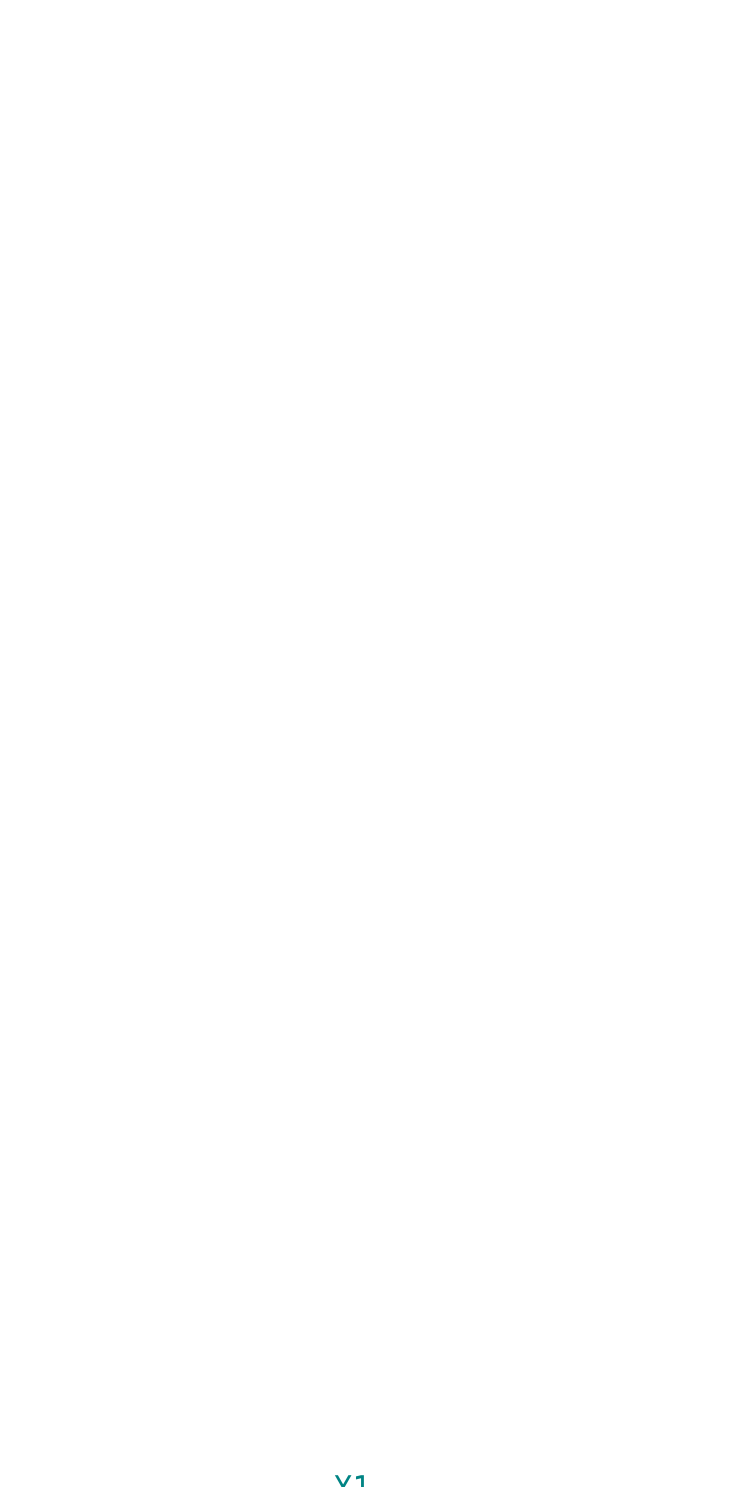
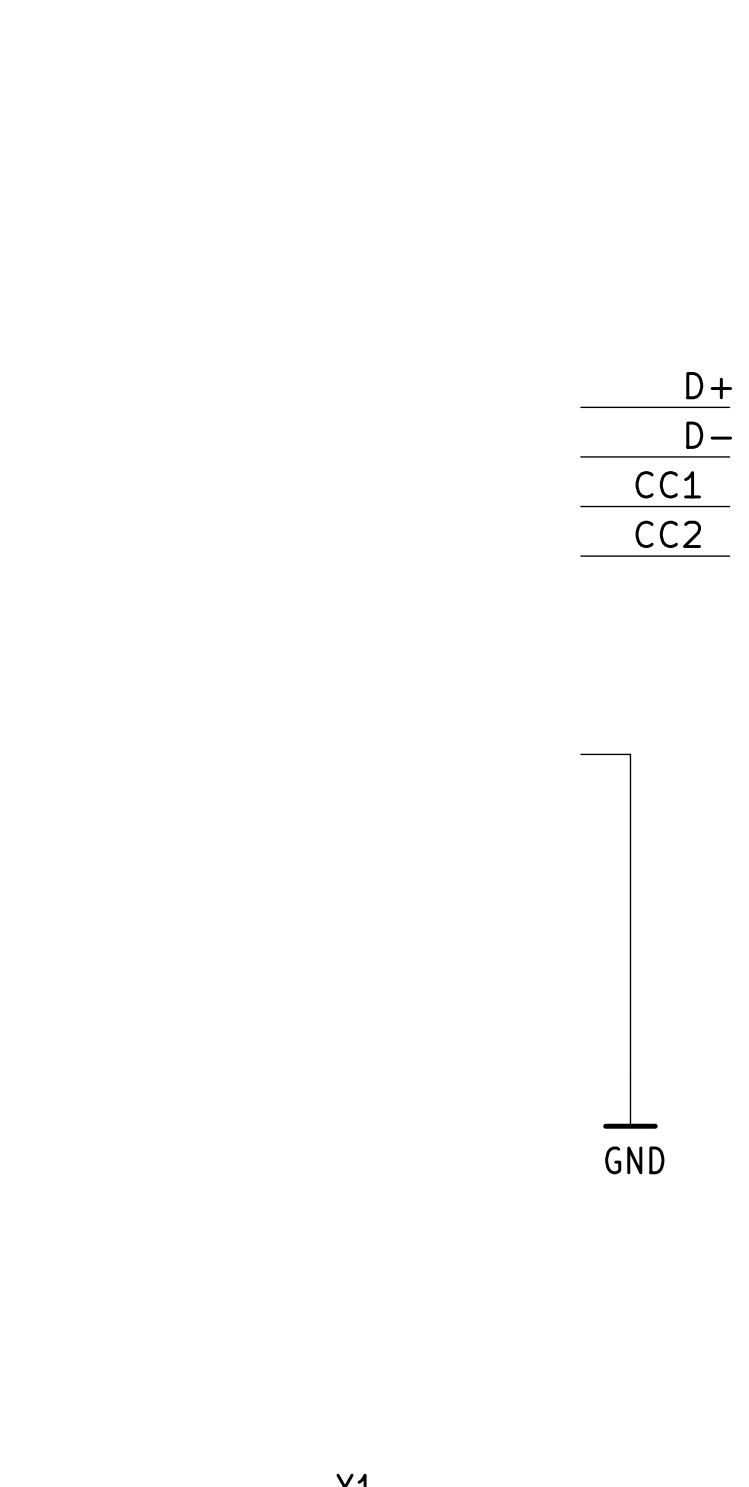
label: none -> D+ (709, 385)
wire: none -> (580, 407) (729, 407)
label: none -> D- (709, 435)
wire: none -> (580, 456) (729, 456)
label: none -> CC1 (668, 484)
wire: none -> (580, 506) (729, 506)
label: none -> CC2 (668, 534)
wire: none -> (580, 556) (729, 556)
wire: none -> (580, 754) (630, 754) (630, 1076)
power symbol: none -> GND (630, 1102)

